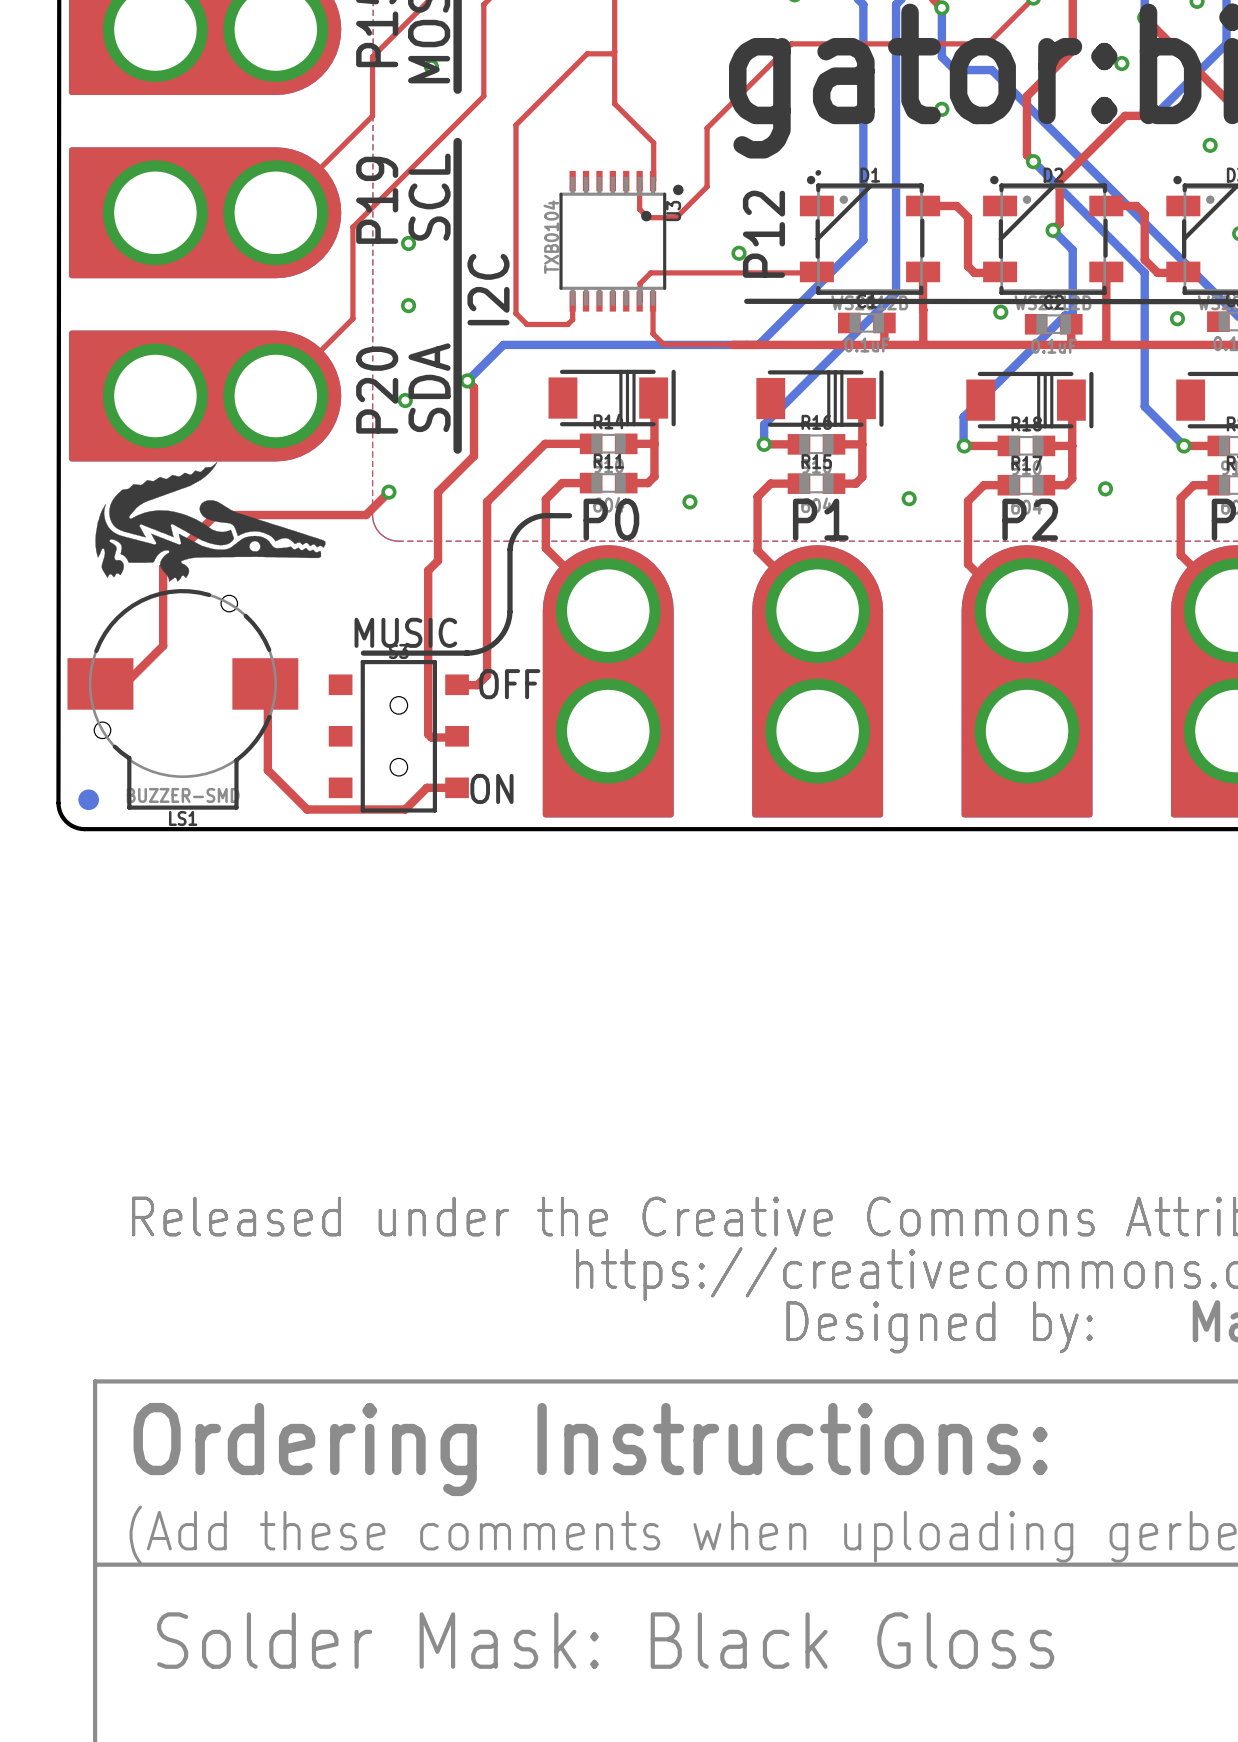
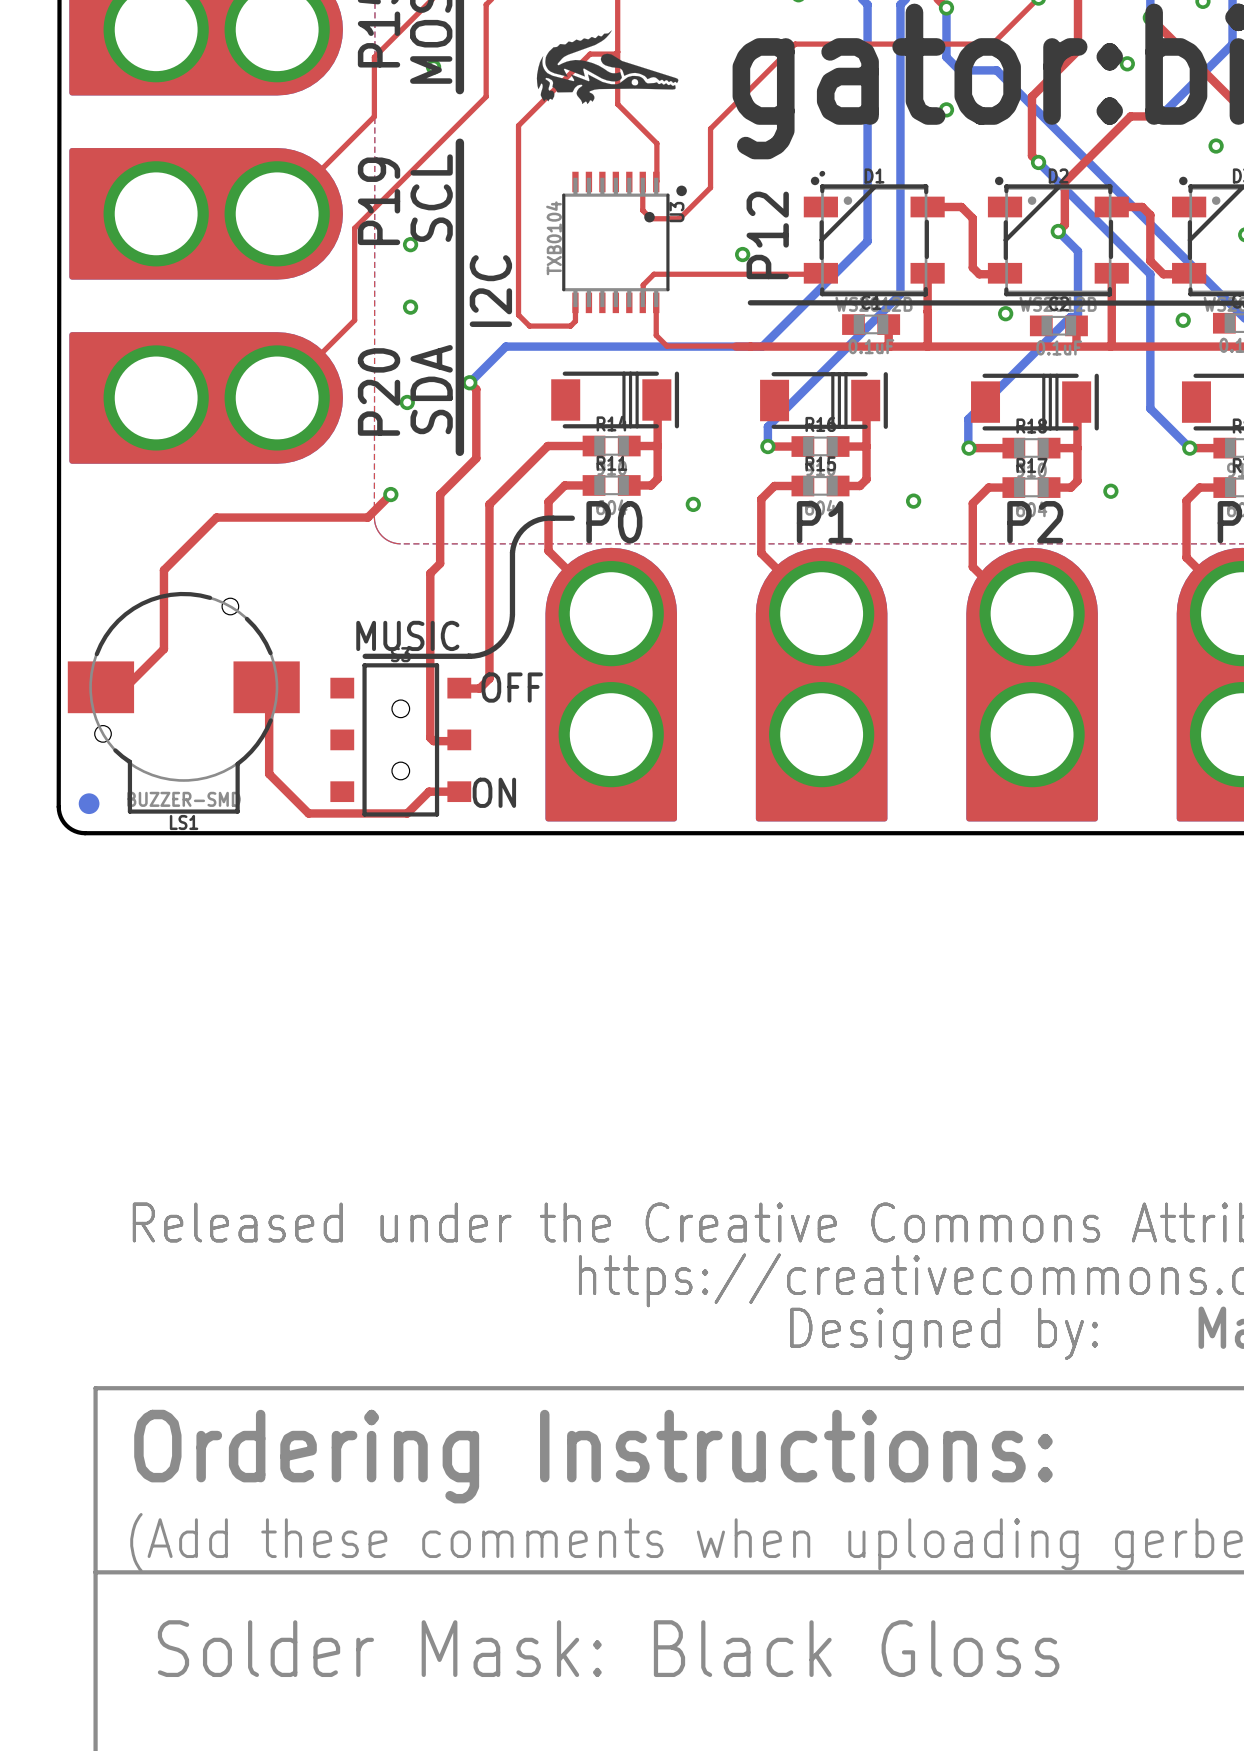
drawing: none -> [536, 30, 679, 105]
drawing: [95, 462, 326, 582] -> none

